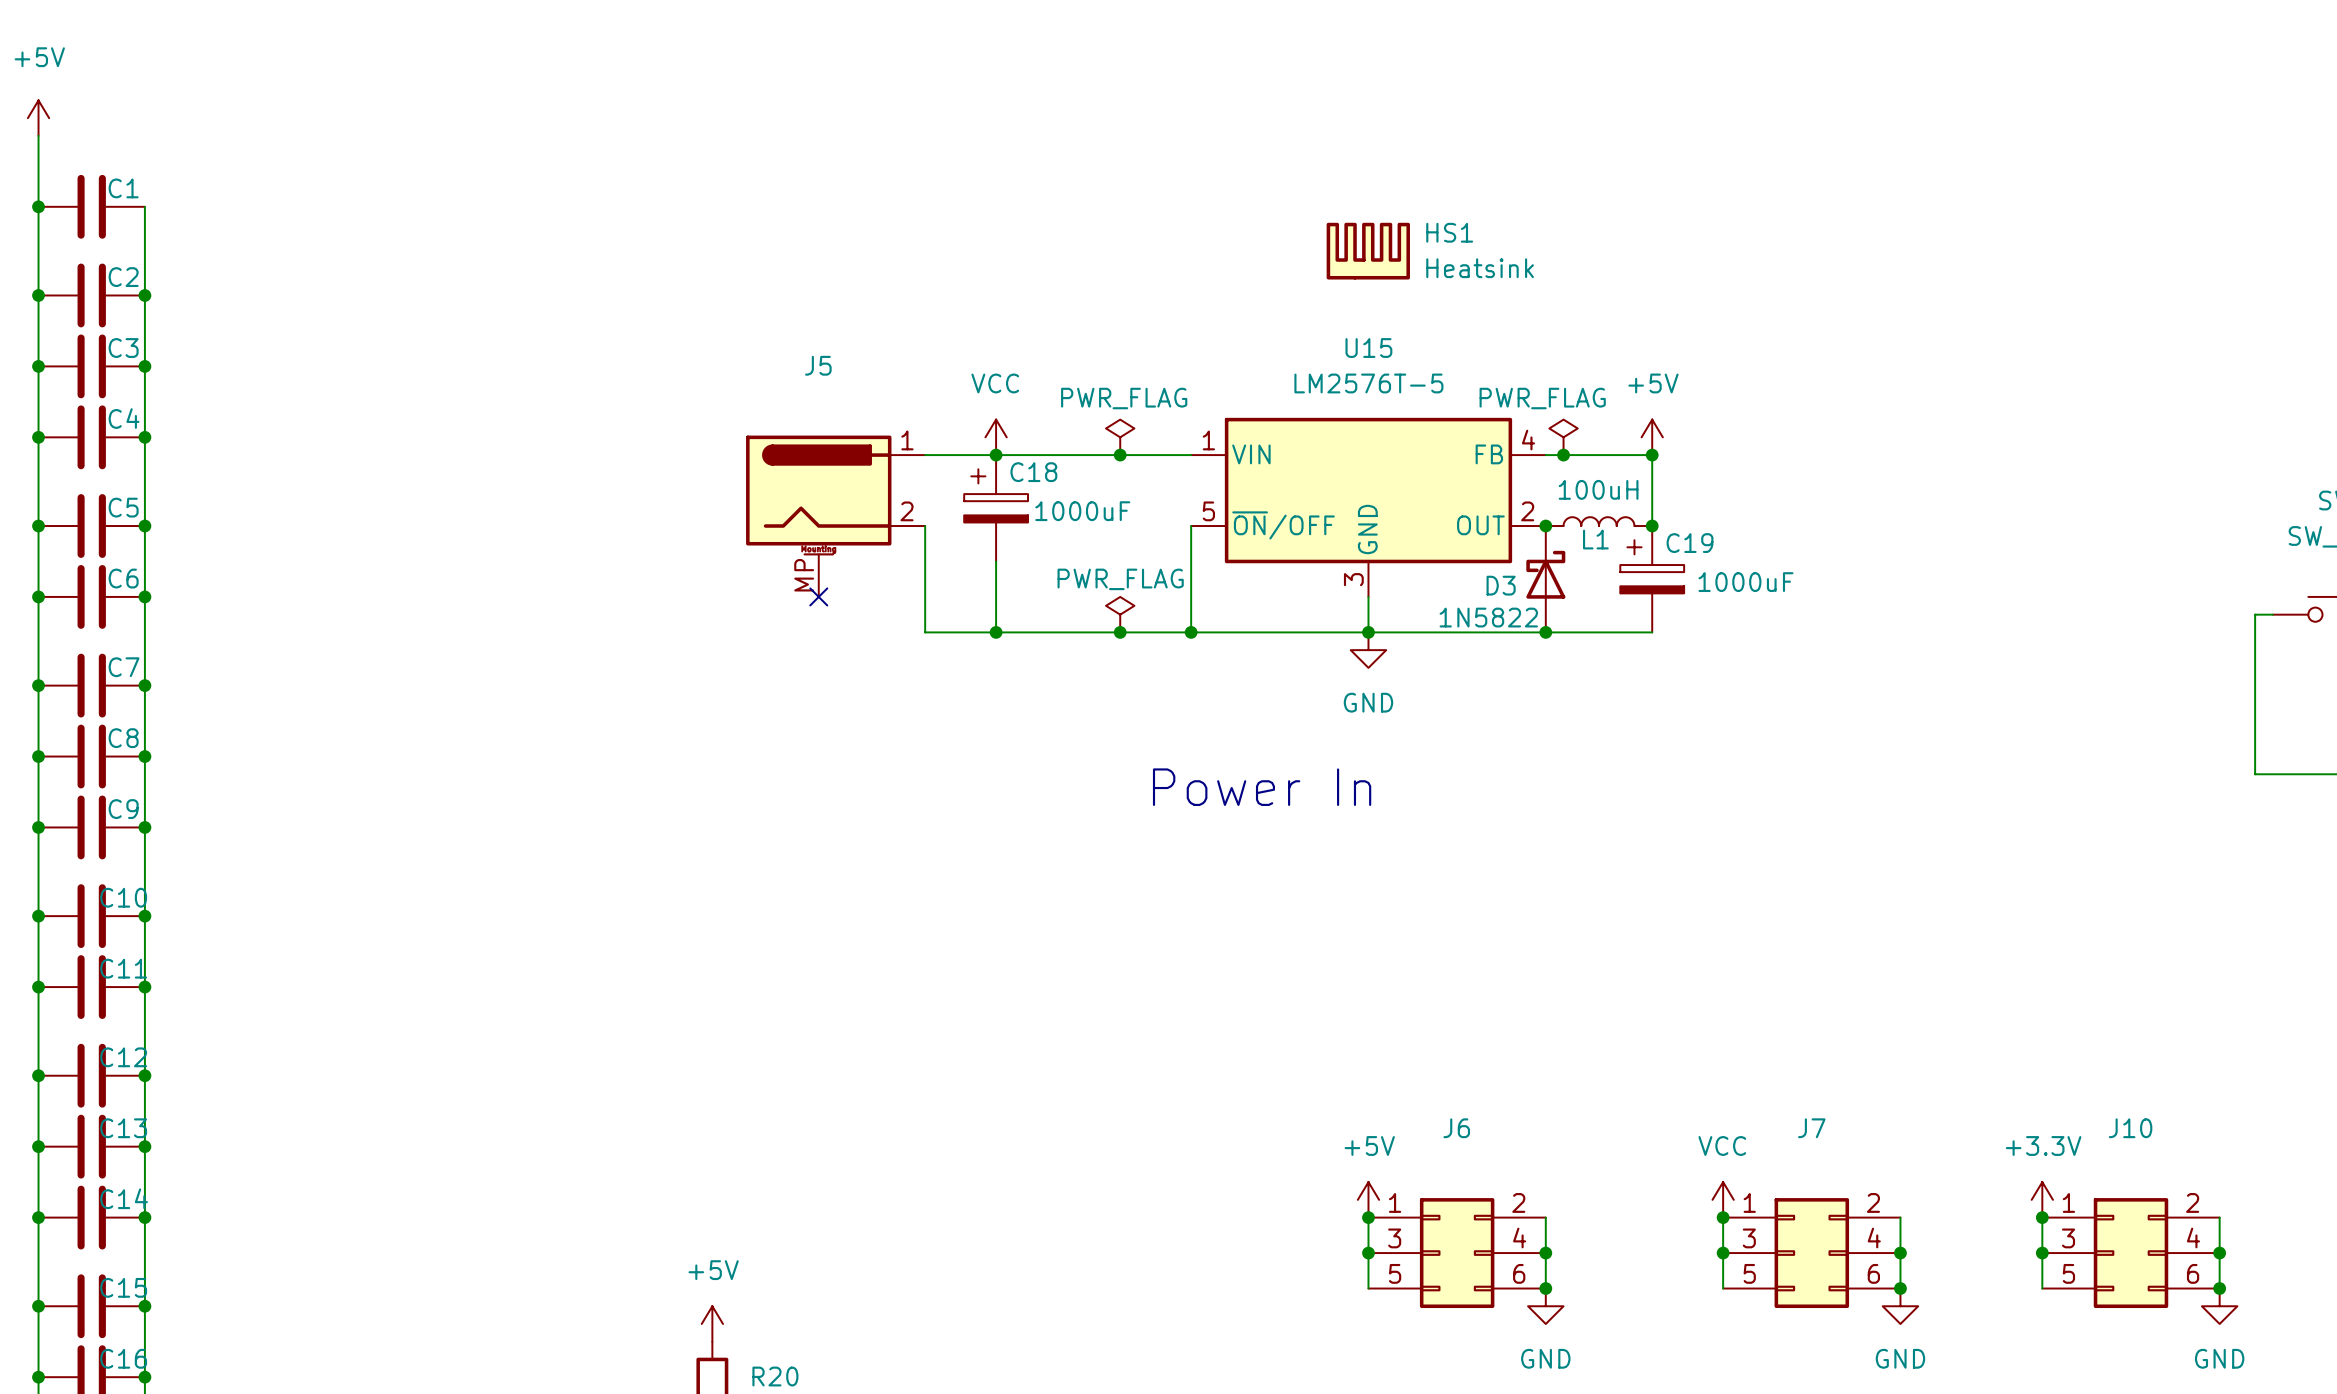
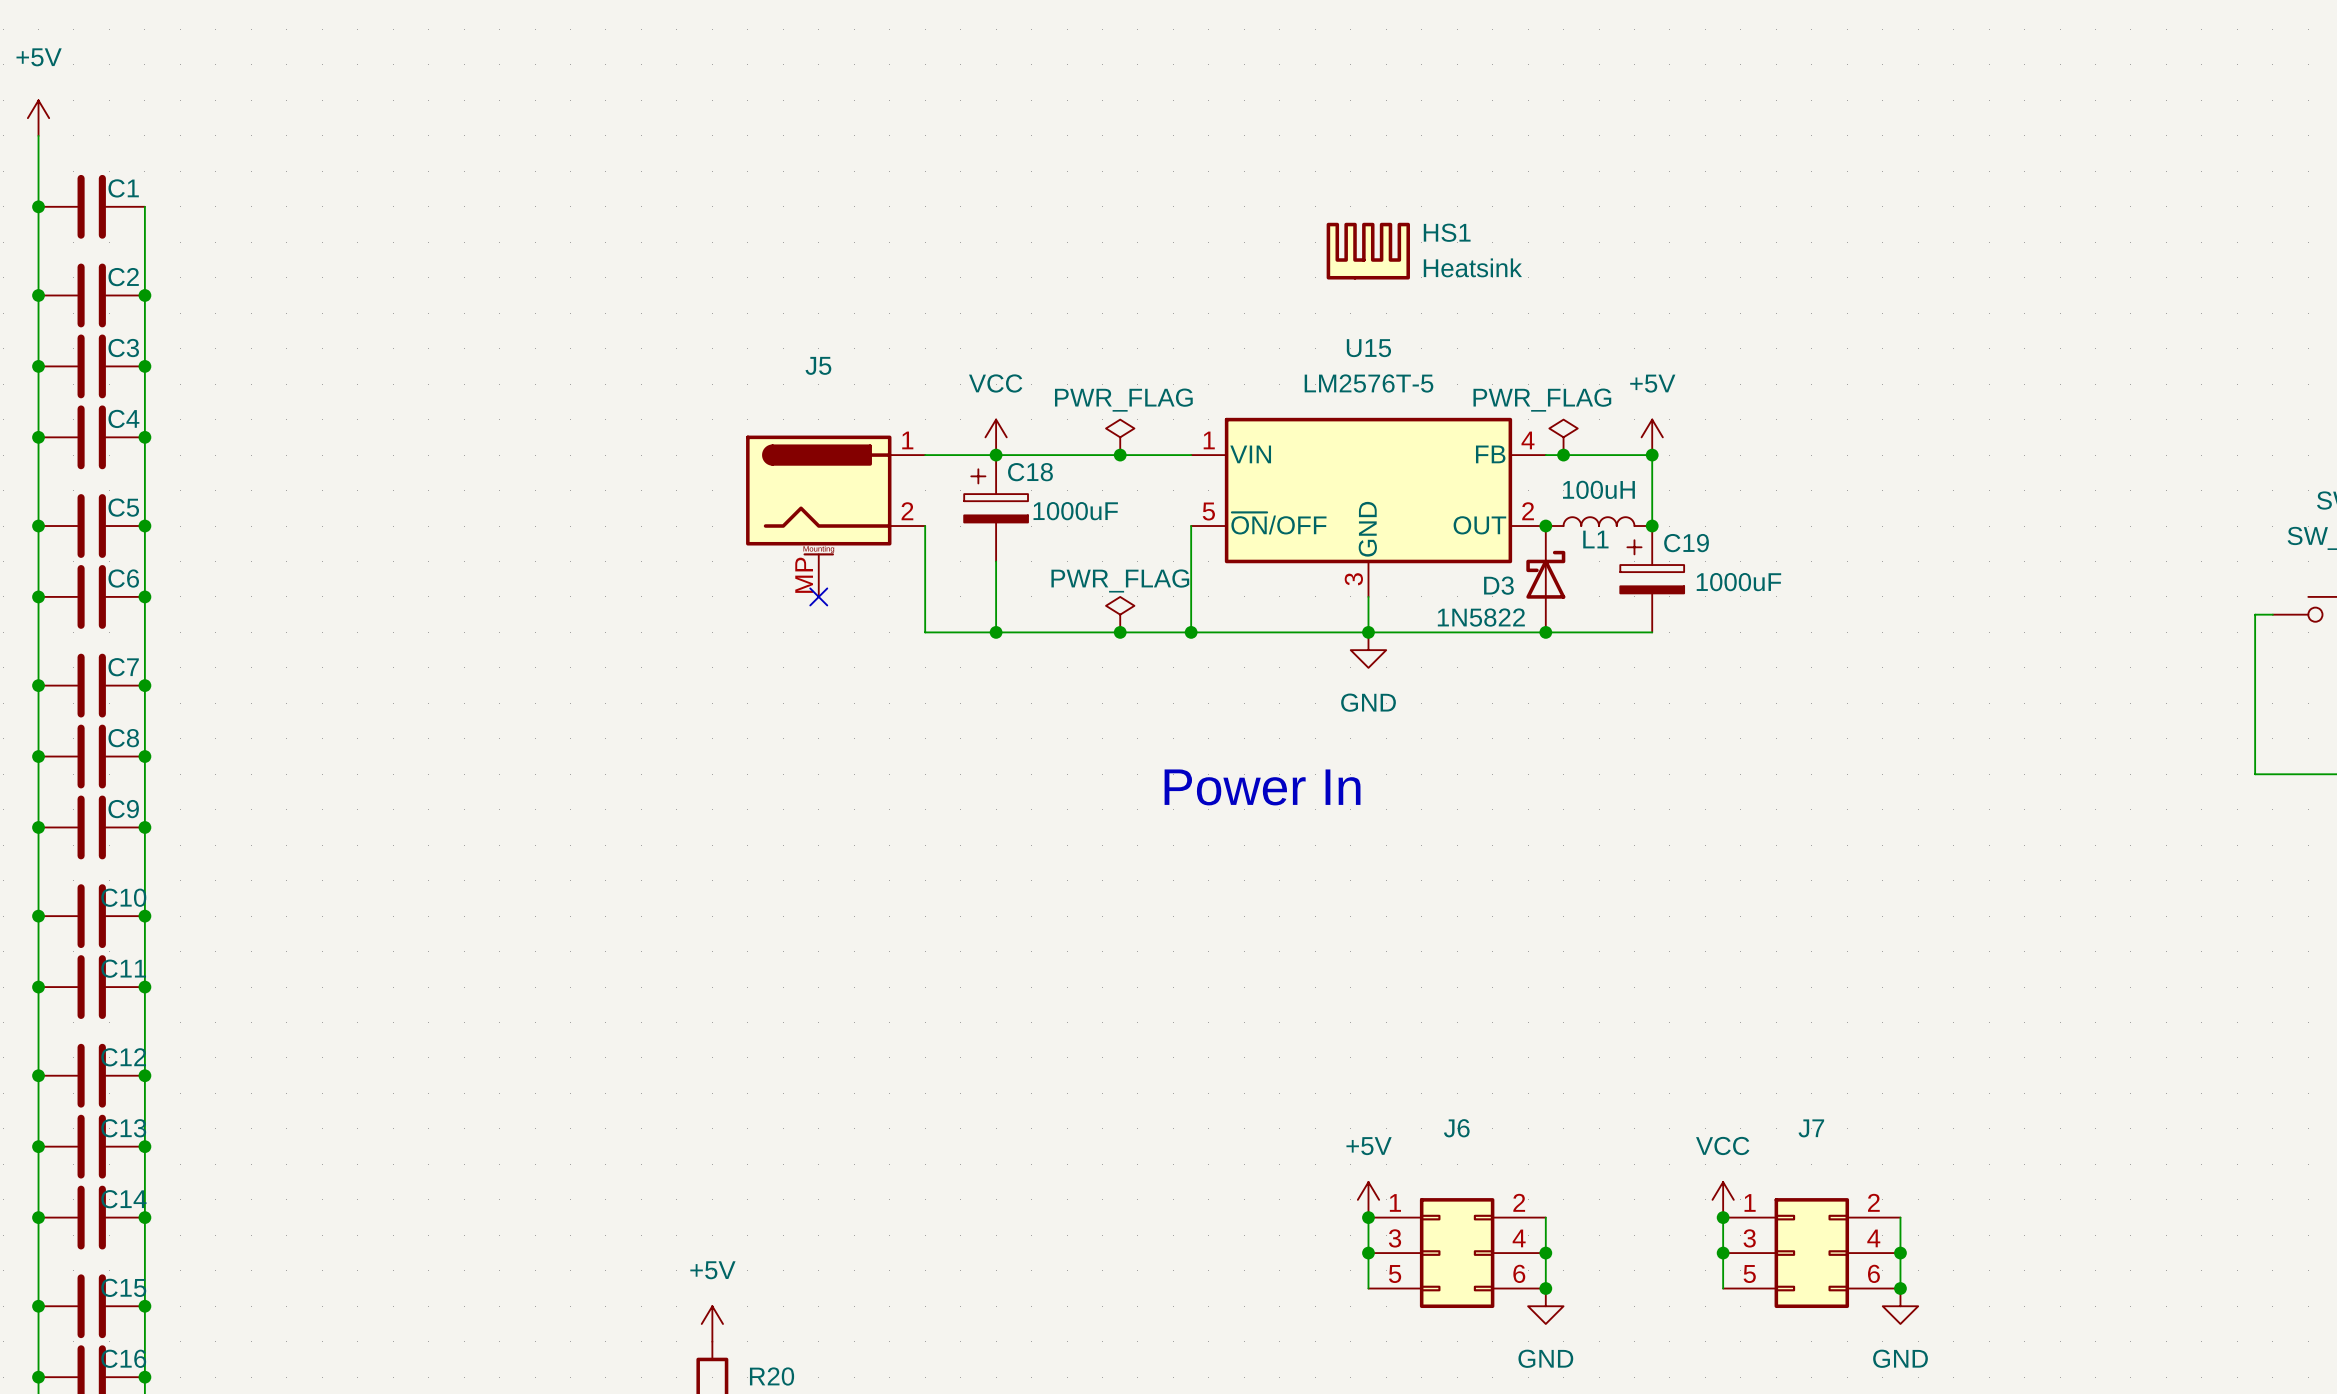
power symbol: +3.3V (2042, 1199) -> none
wire: (2042, 1217) (2042, 1288) -> none
junction: (2042, 1217) -> none
wire: (2219, 1217) (2219, 1288) -> none
junction: (2042, 1253) -> none
J10: (2130, 1253) -> none
junction: (2219, 1253) -> none
junction: (2219, 1288) -> none
power symbol: GND (2219, 1306) -> none

